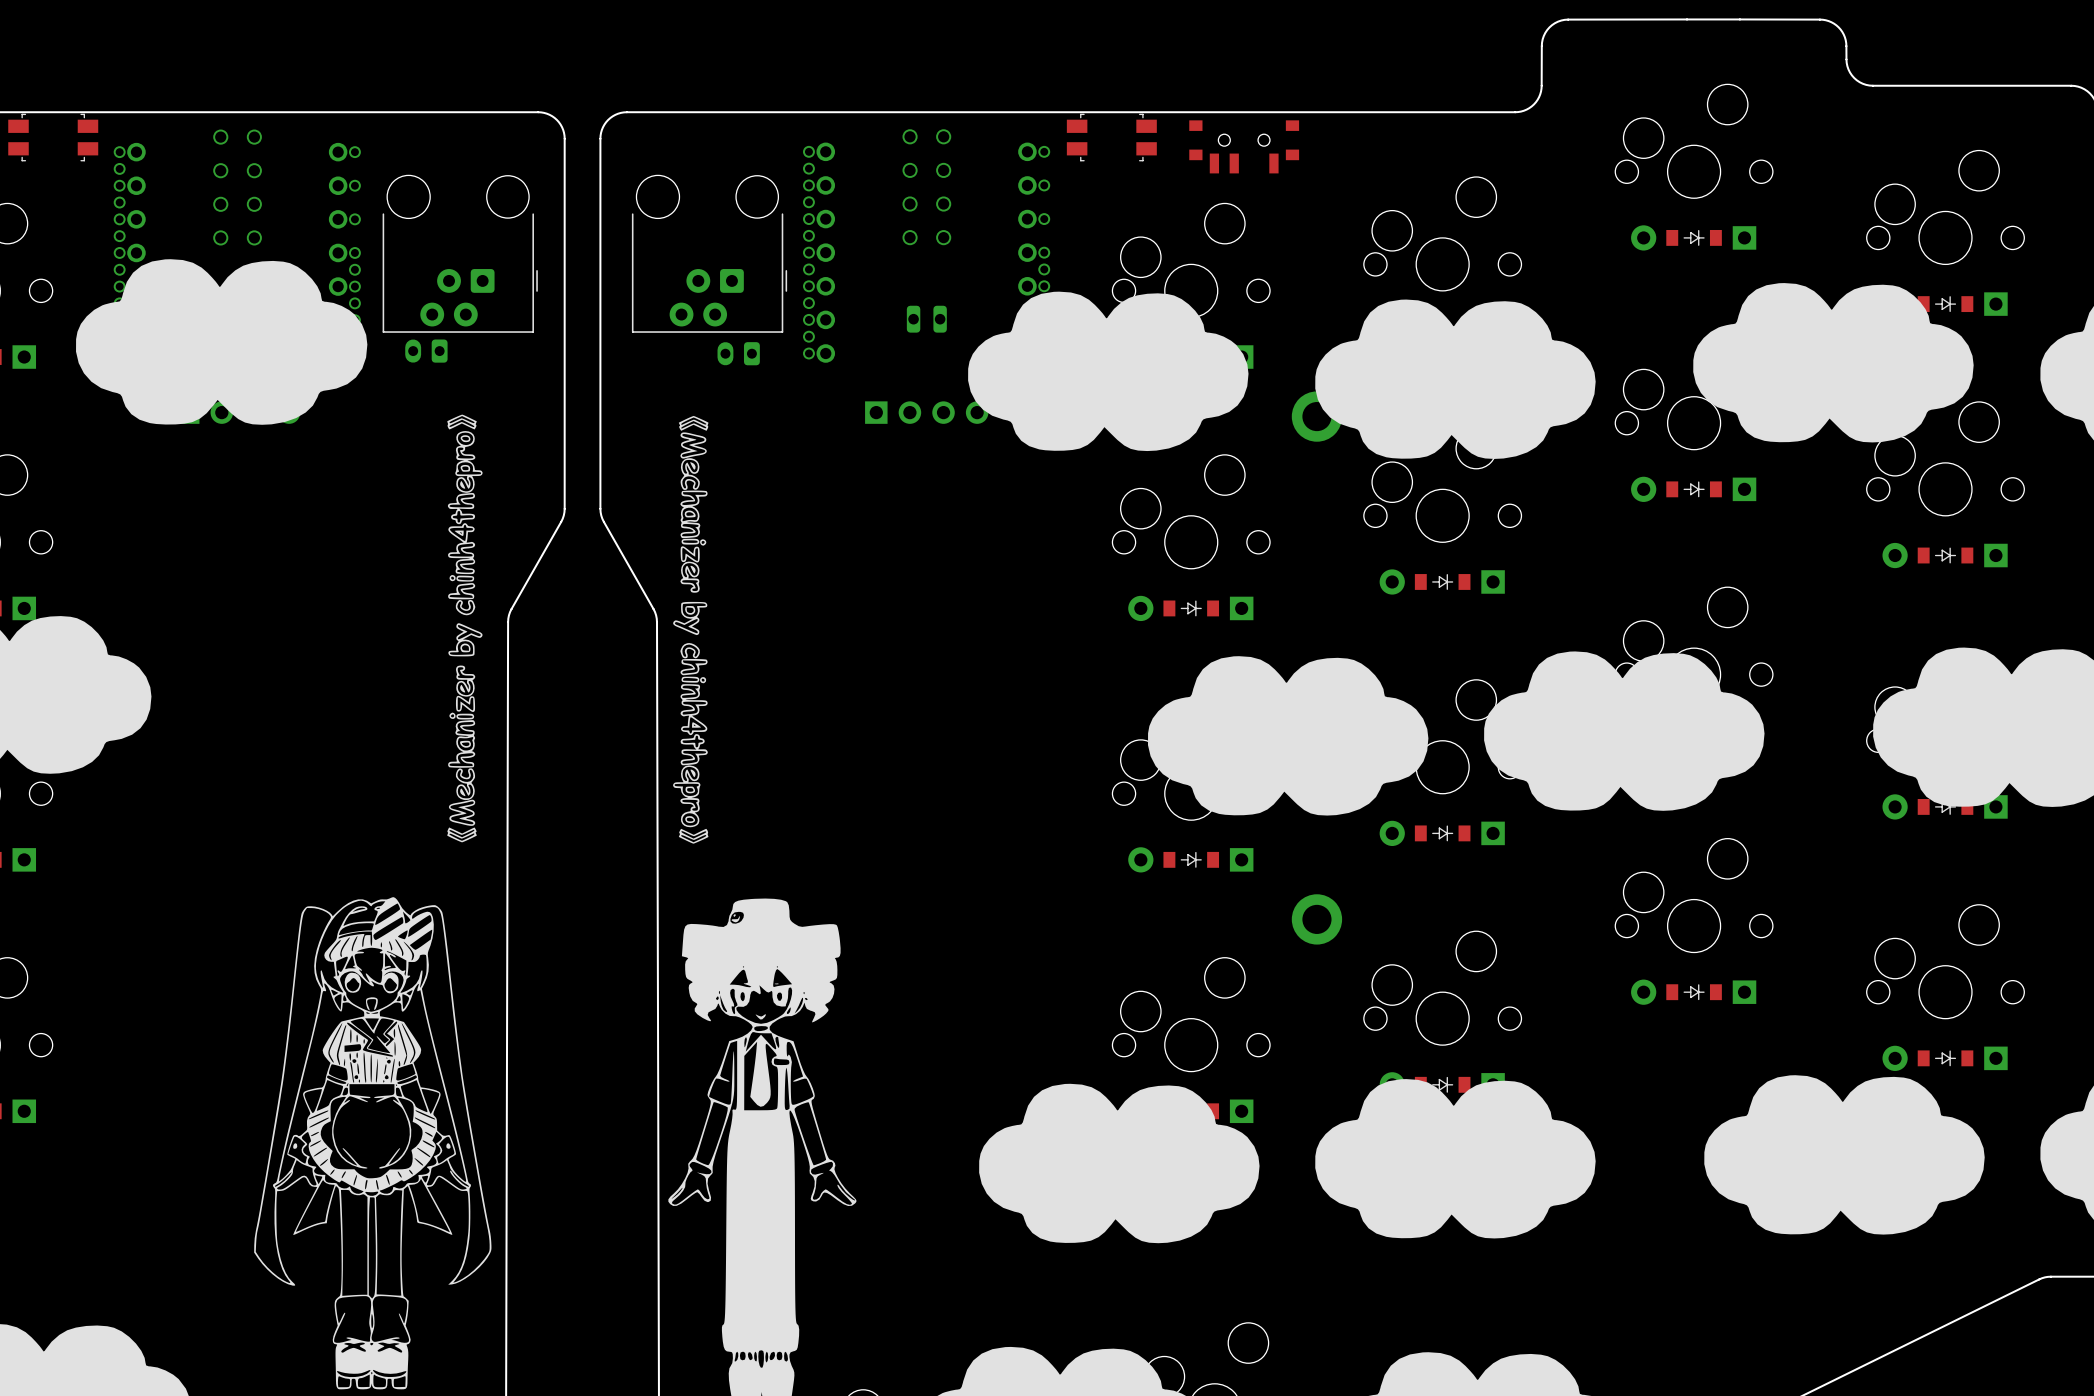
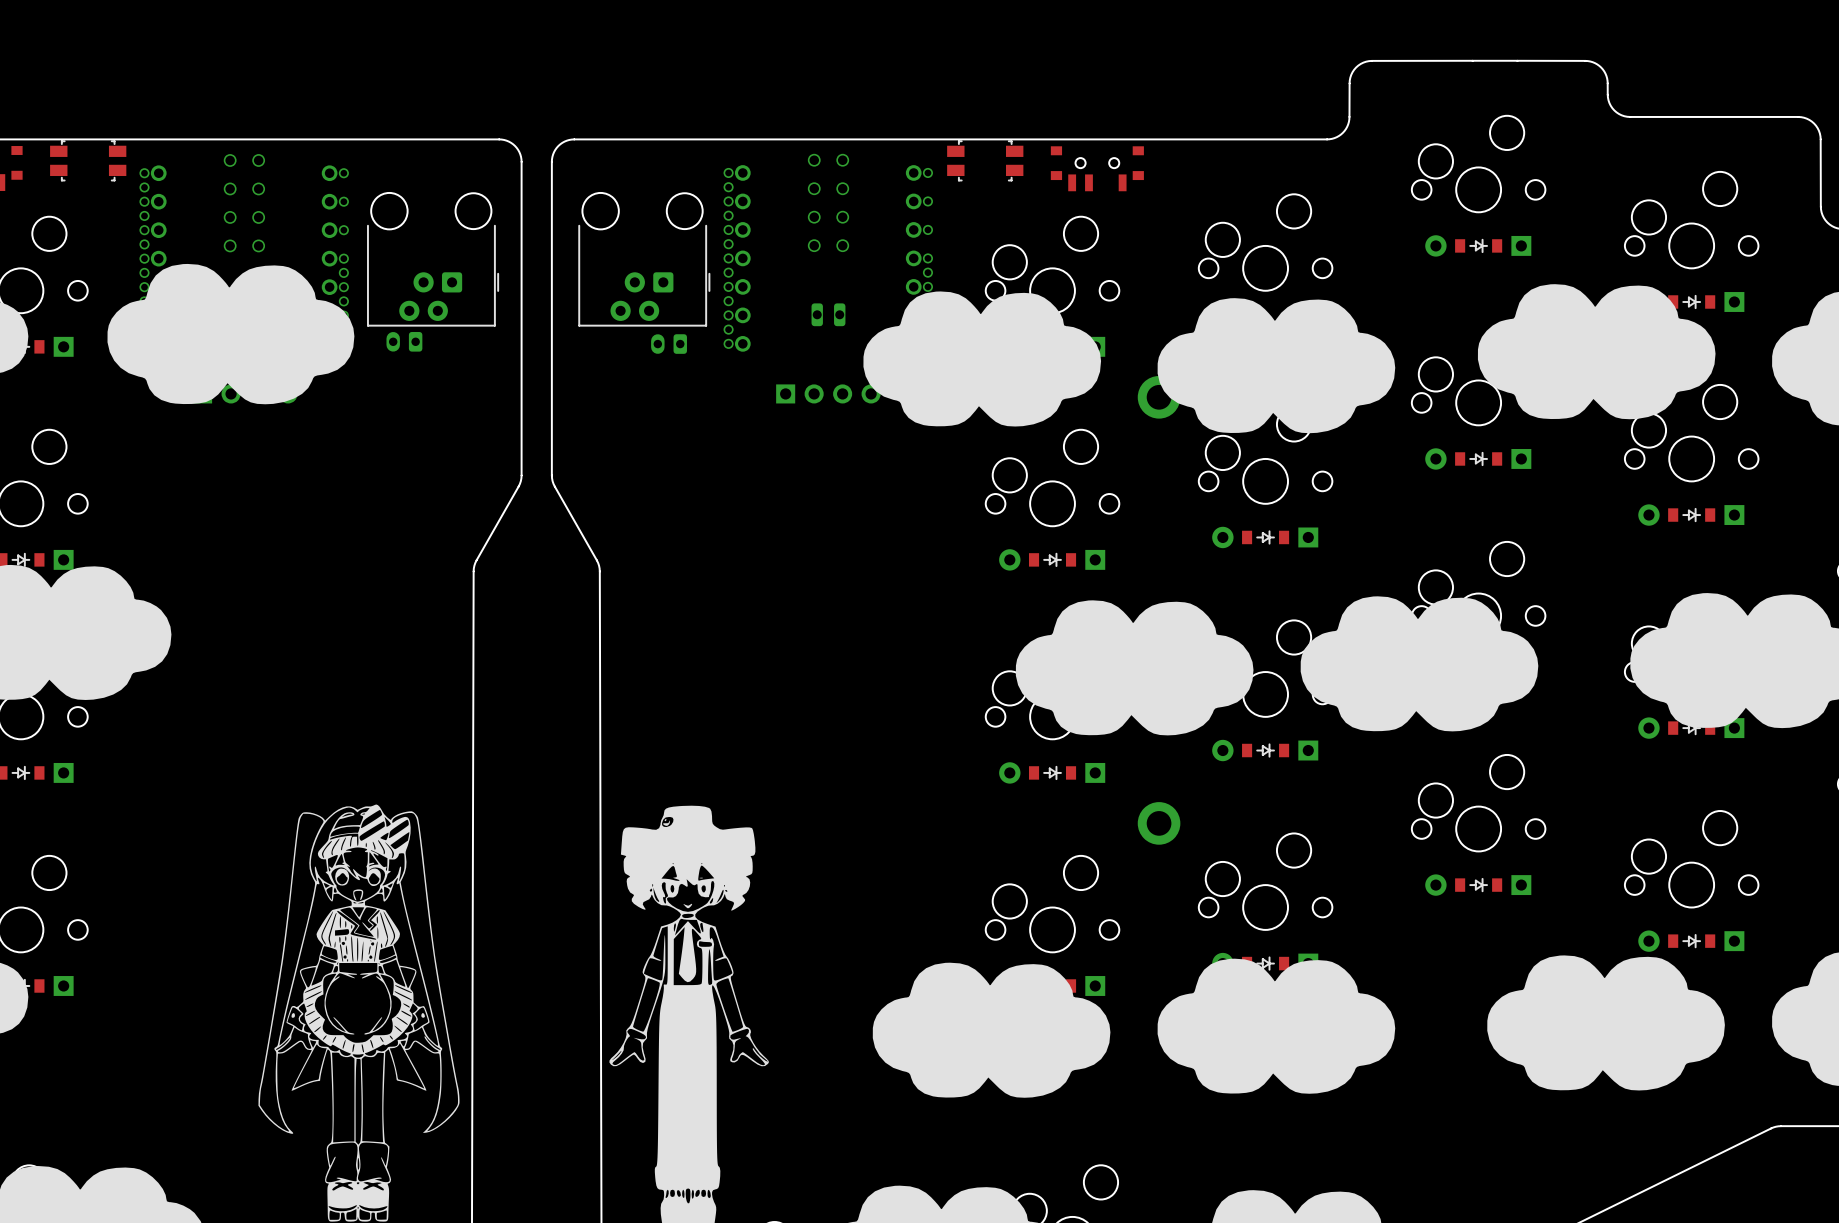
drawing: [447, 414, 483, 843] -> none
drawing: [673, 415, 709, 844] -> none

